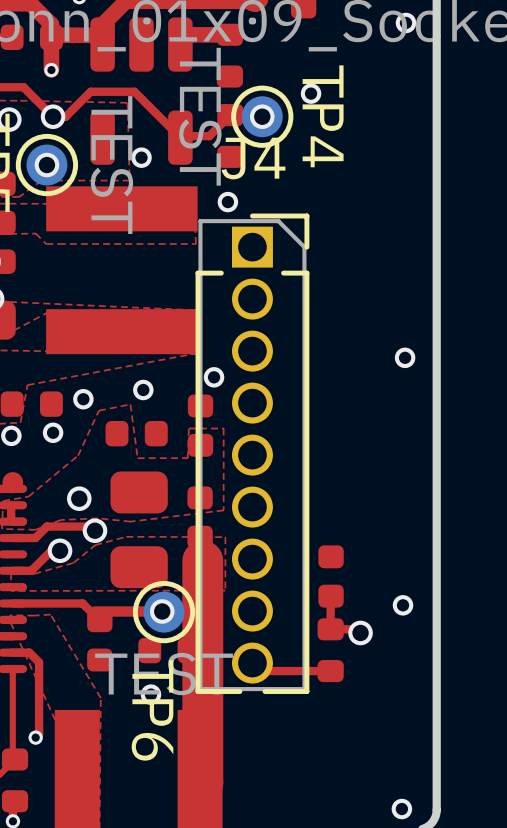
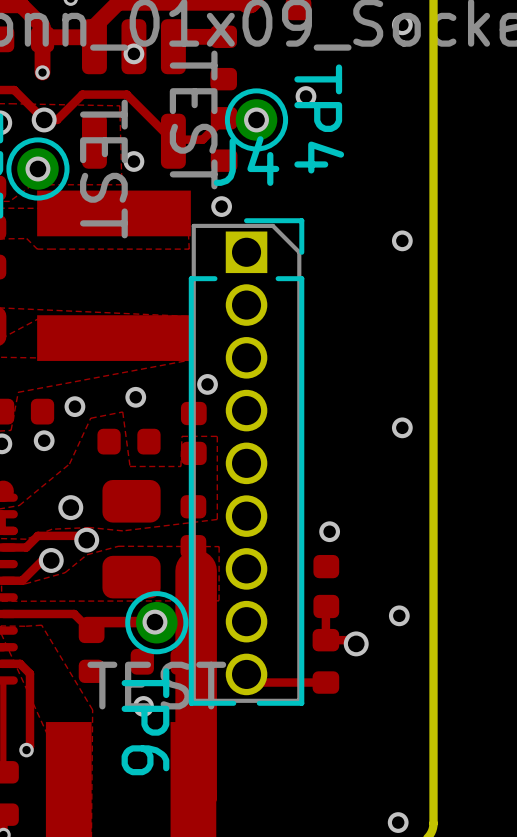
via: none -> (133, 53)
via: none -> (402, 240)
via: (405, 357) -> none
via: none -> (402, 427)
via: none -> (329, 531)

